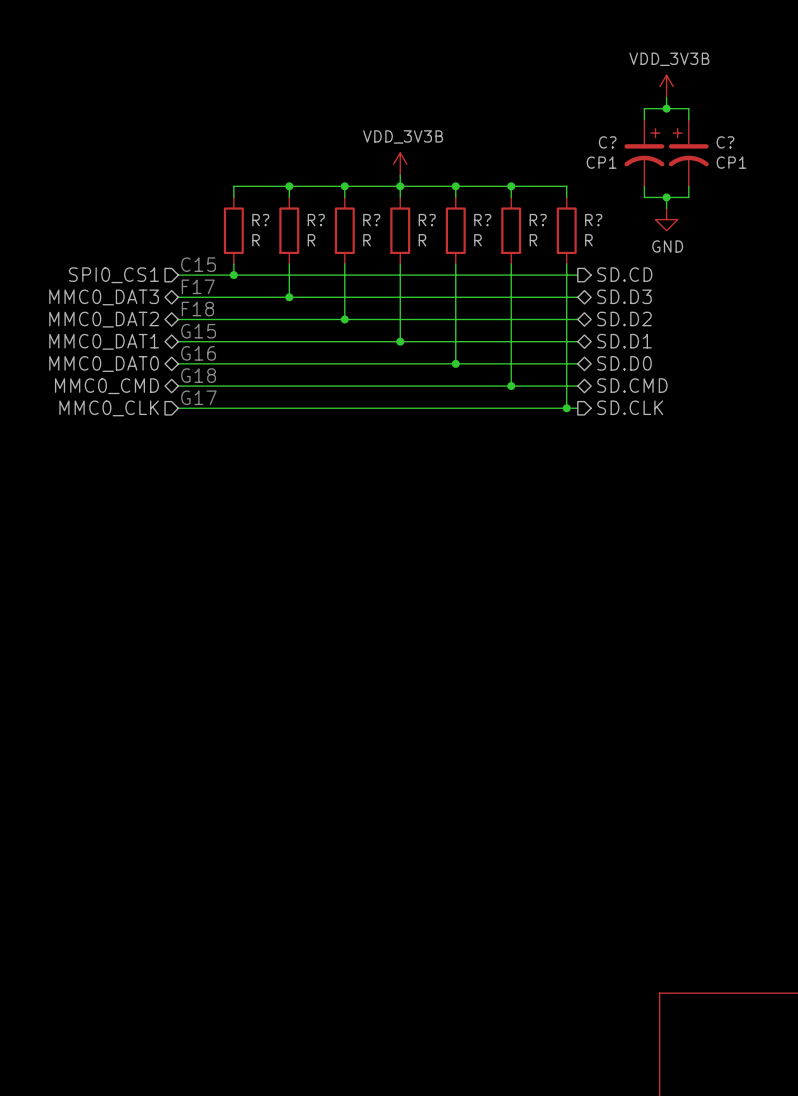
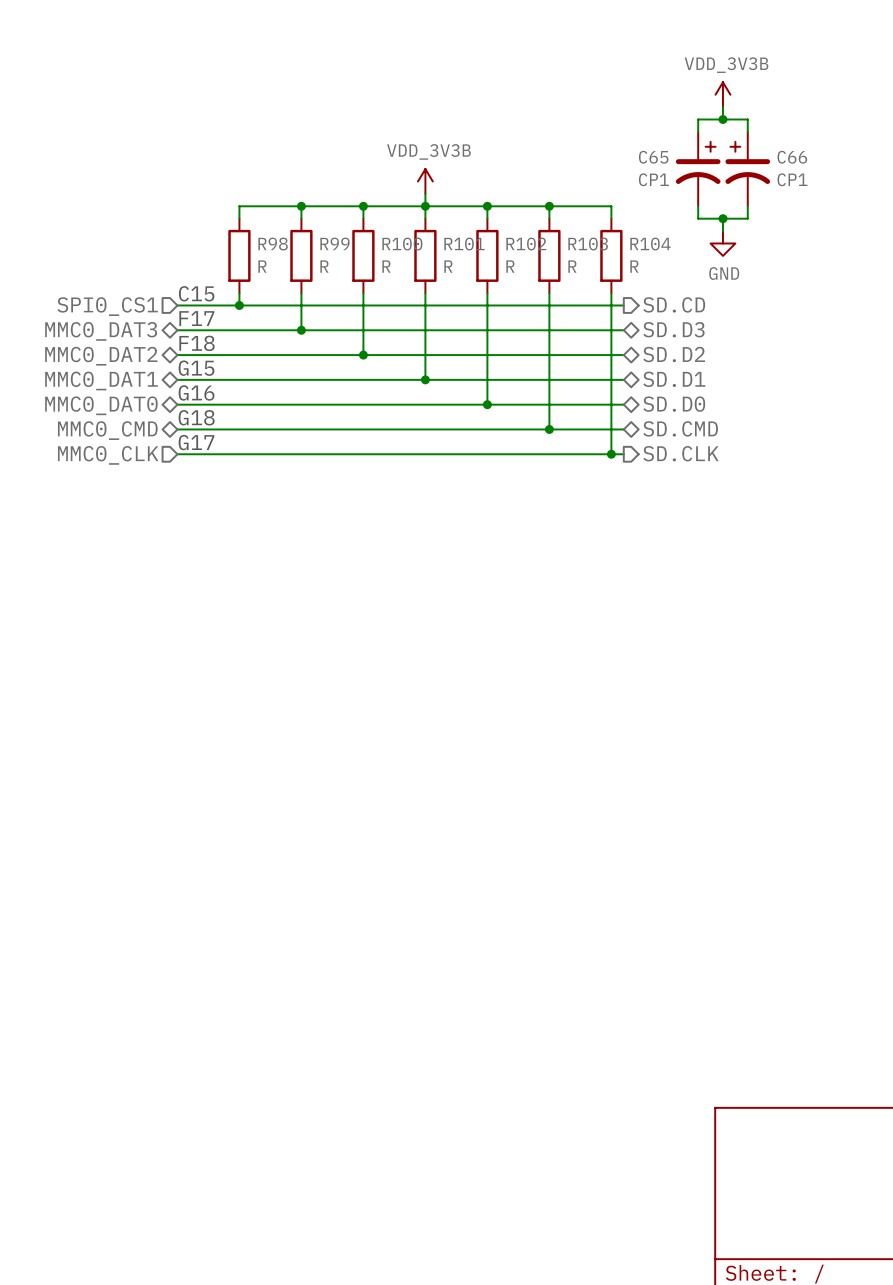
C? name: C? (607, 142) -> C65 (653, 157)
C? name: C? (725, 142) -> C66 (792, 157)
R? name: R? (260, 220) -> R98 (273, 244)
R? name: R? (316, 220) -> R99 (335, 243)
R? name: R? (371, 220) -> R100 (402, 244)
R? name: R? (427, 220) -> R101 (464, 244)
R? name: R? (482, 220) -> R102 (526, 244)
R? name: R? (538, 220) -> R103 (588, 244)
R? name: R? (593, 220) -> R104 (650, 244)

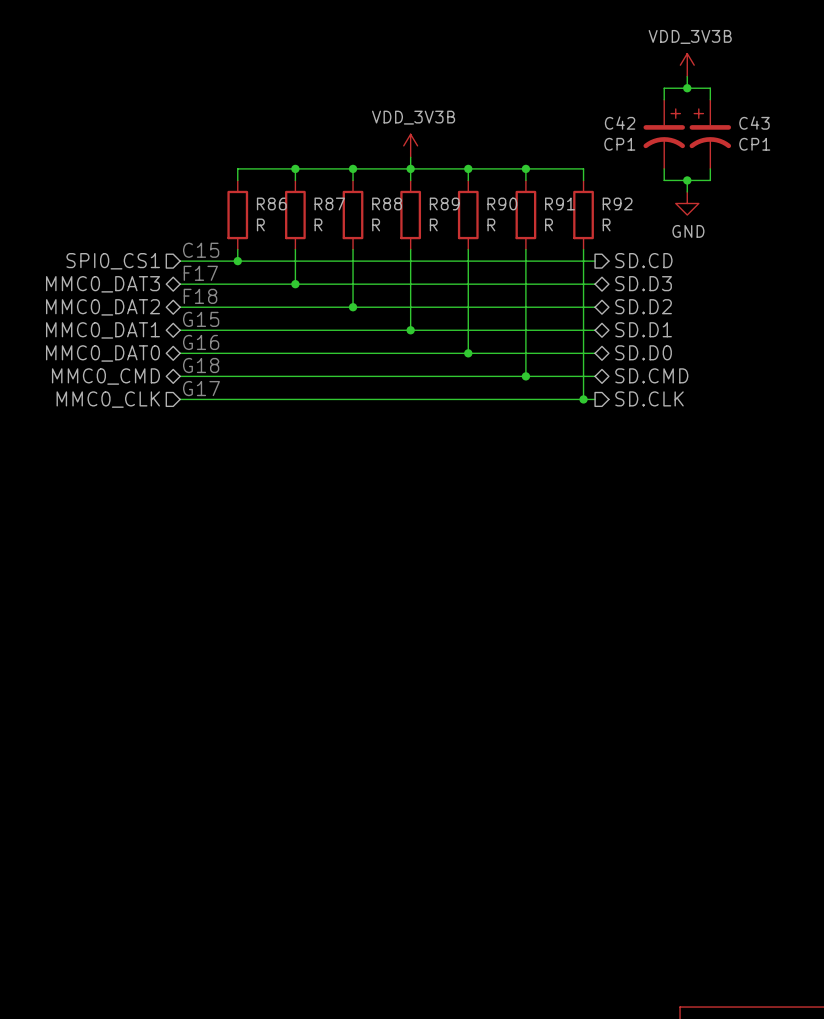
C65 name: C65 (653, 157) -> C42 (620, 123)
C66 name: C66 (792, 157) -> C43 (754, 123)
R99 name: R99 (335, 243) -> R87 (329, 203)
R98 name: R98 (273, 244) -> R86 (271, 203)
R100 name: R100 (402, 244) -> R88 (387, 203)
R101 name: R101 (464, 244) -> R89 (444, 203)
R102 name: R102 (526, 244) -> R90 (502, 203)
R103 name: R103 (588, 244) -> R91 (559, 203)
R104 name: R104 (650, 244) -> R92 (617, 203)

